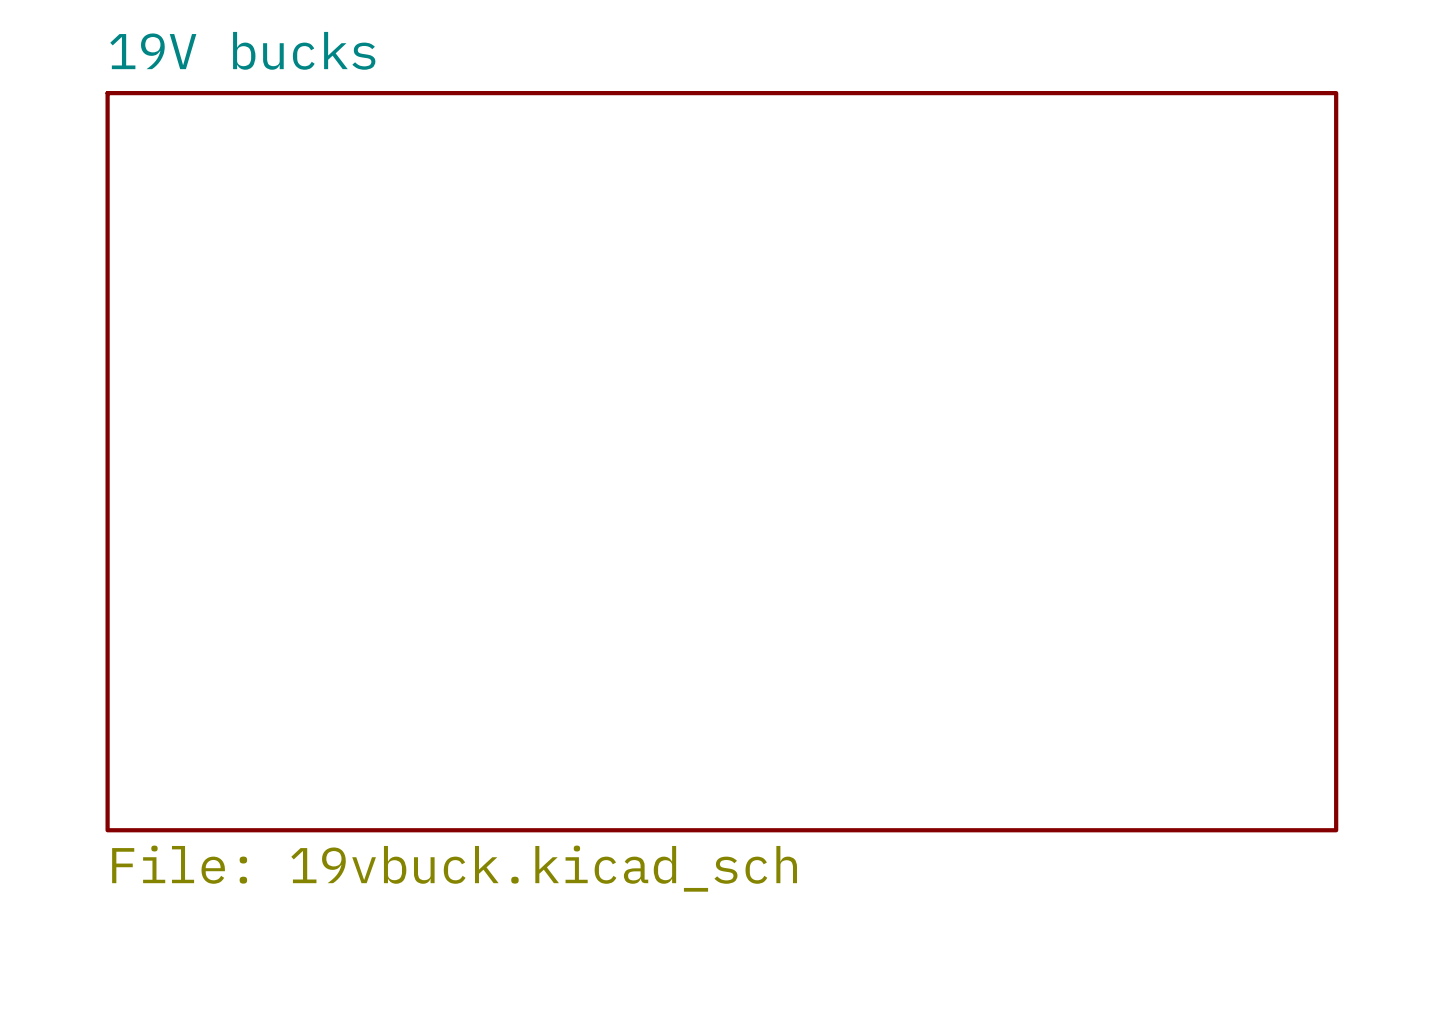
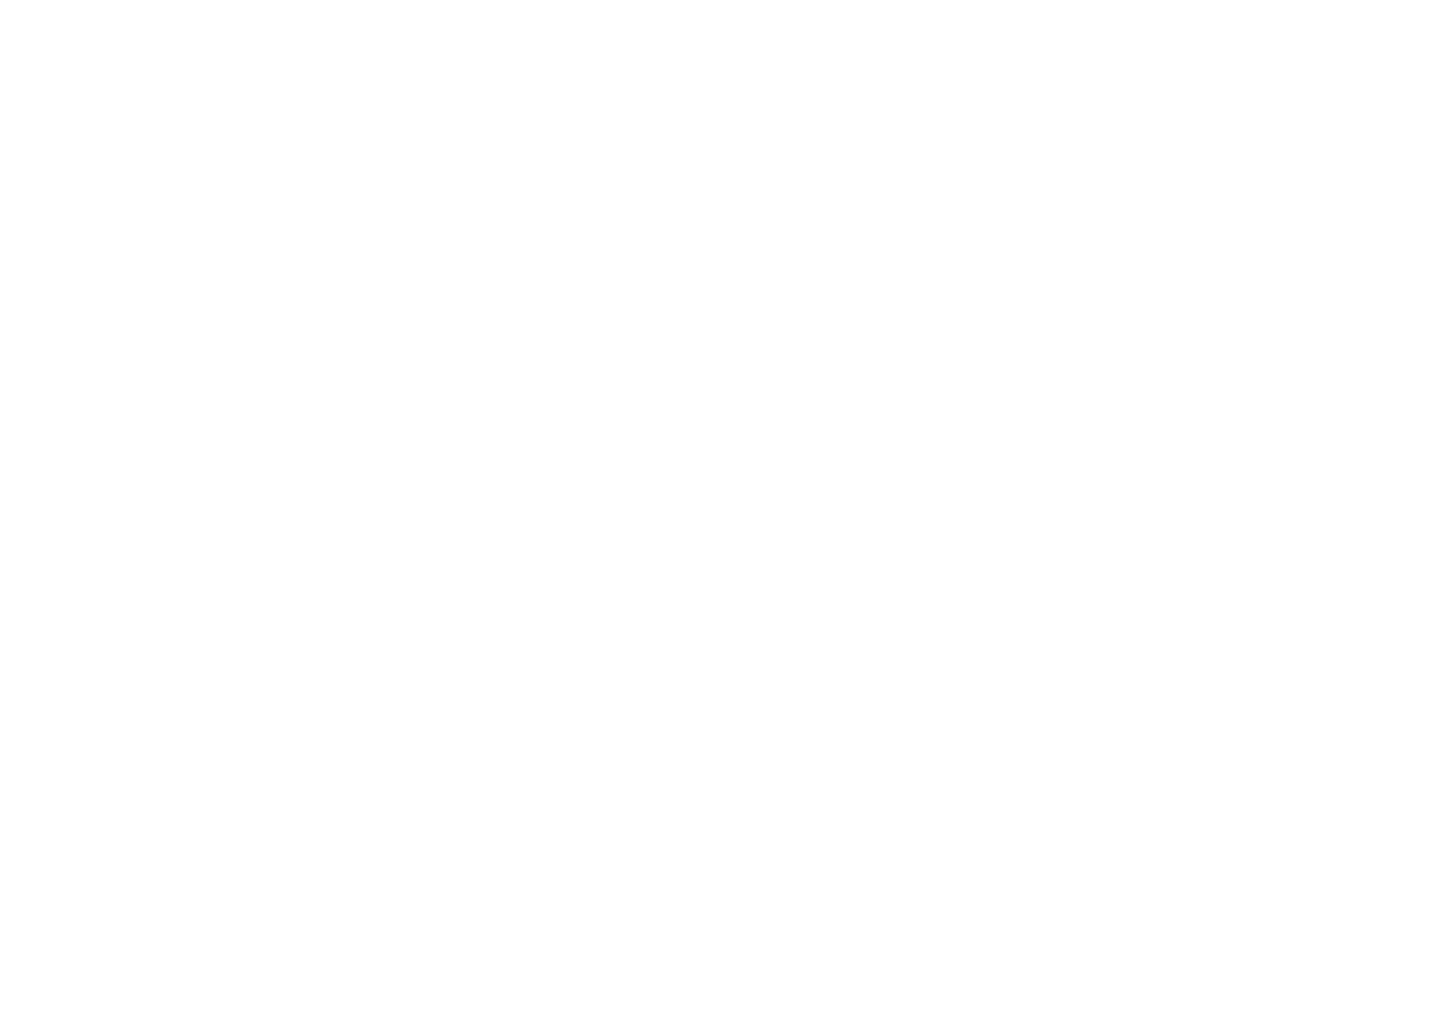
sheet 19V bucks: File: 19vbuck.kicad_sch (721, 461) -> none

